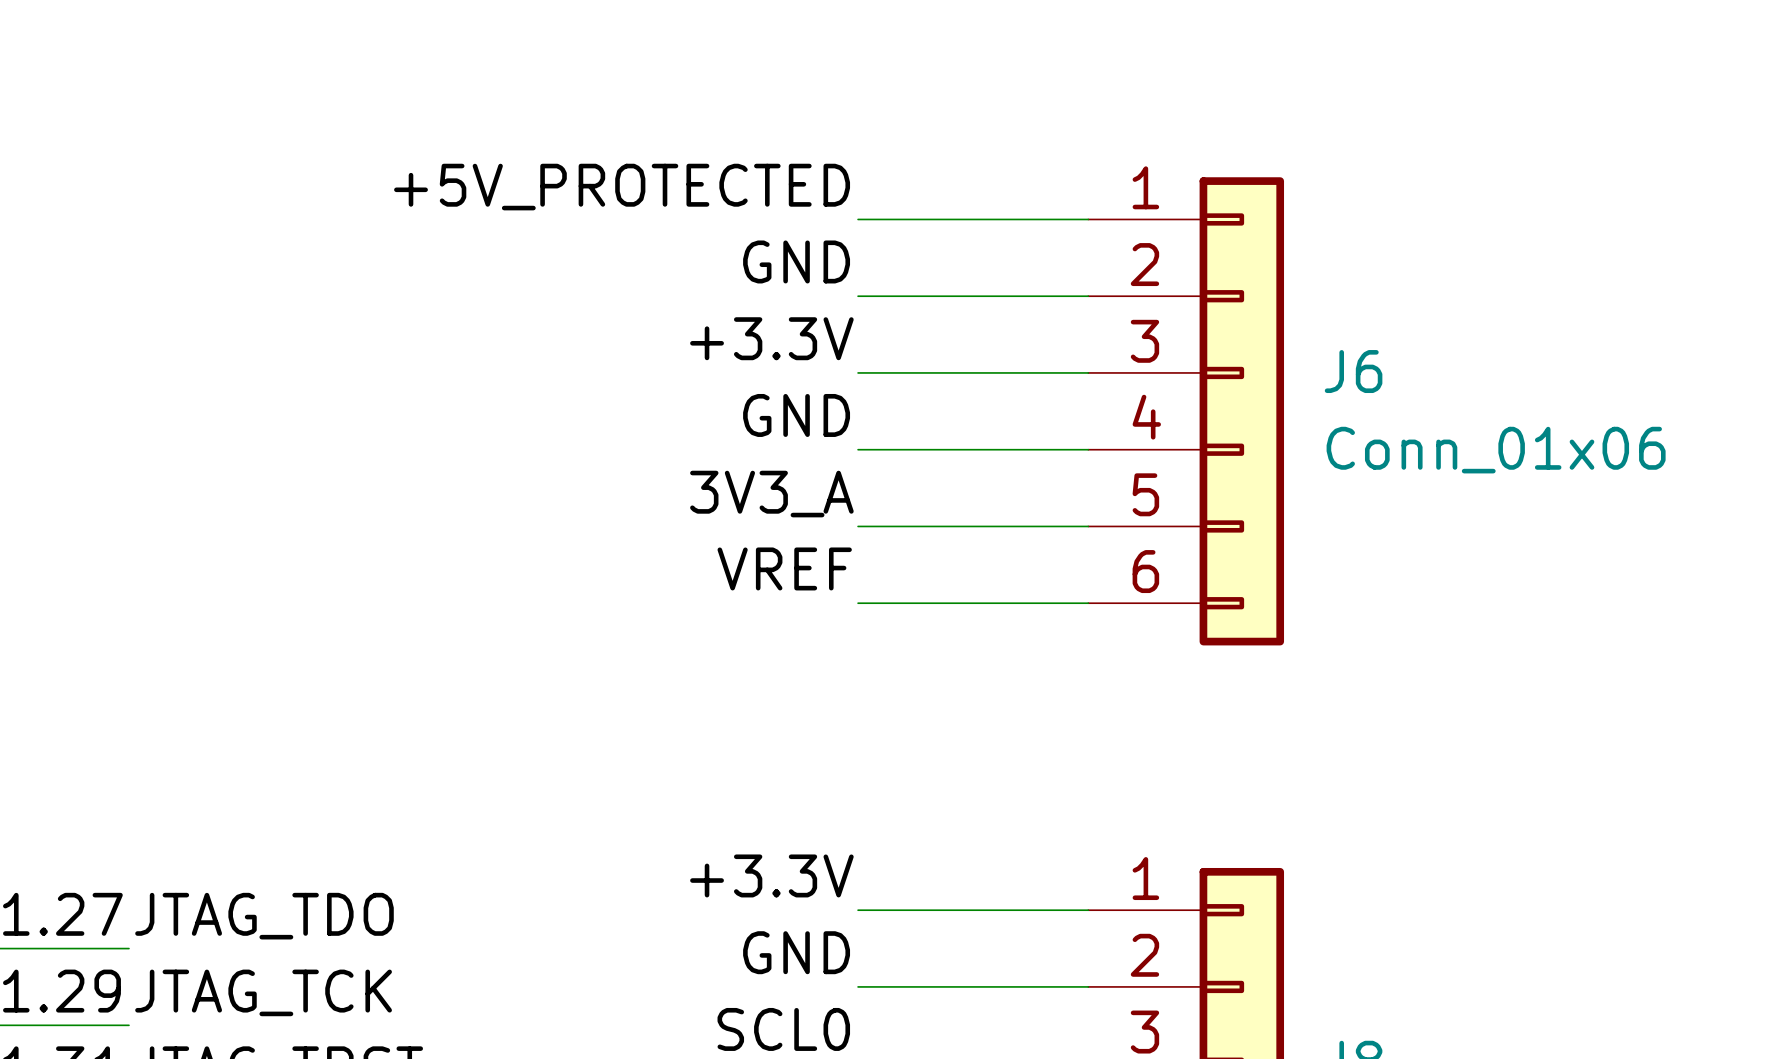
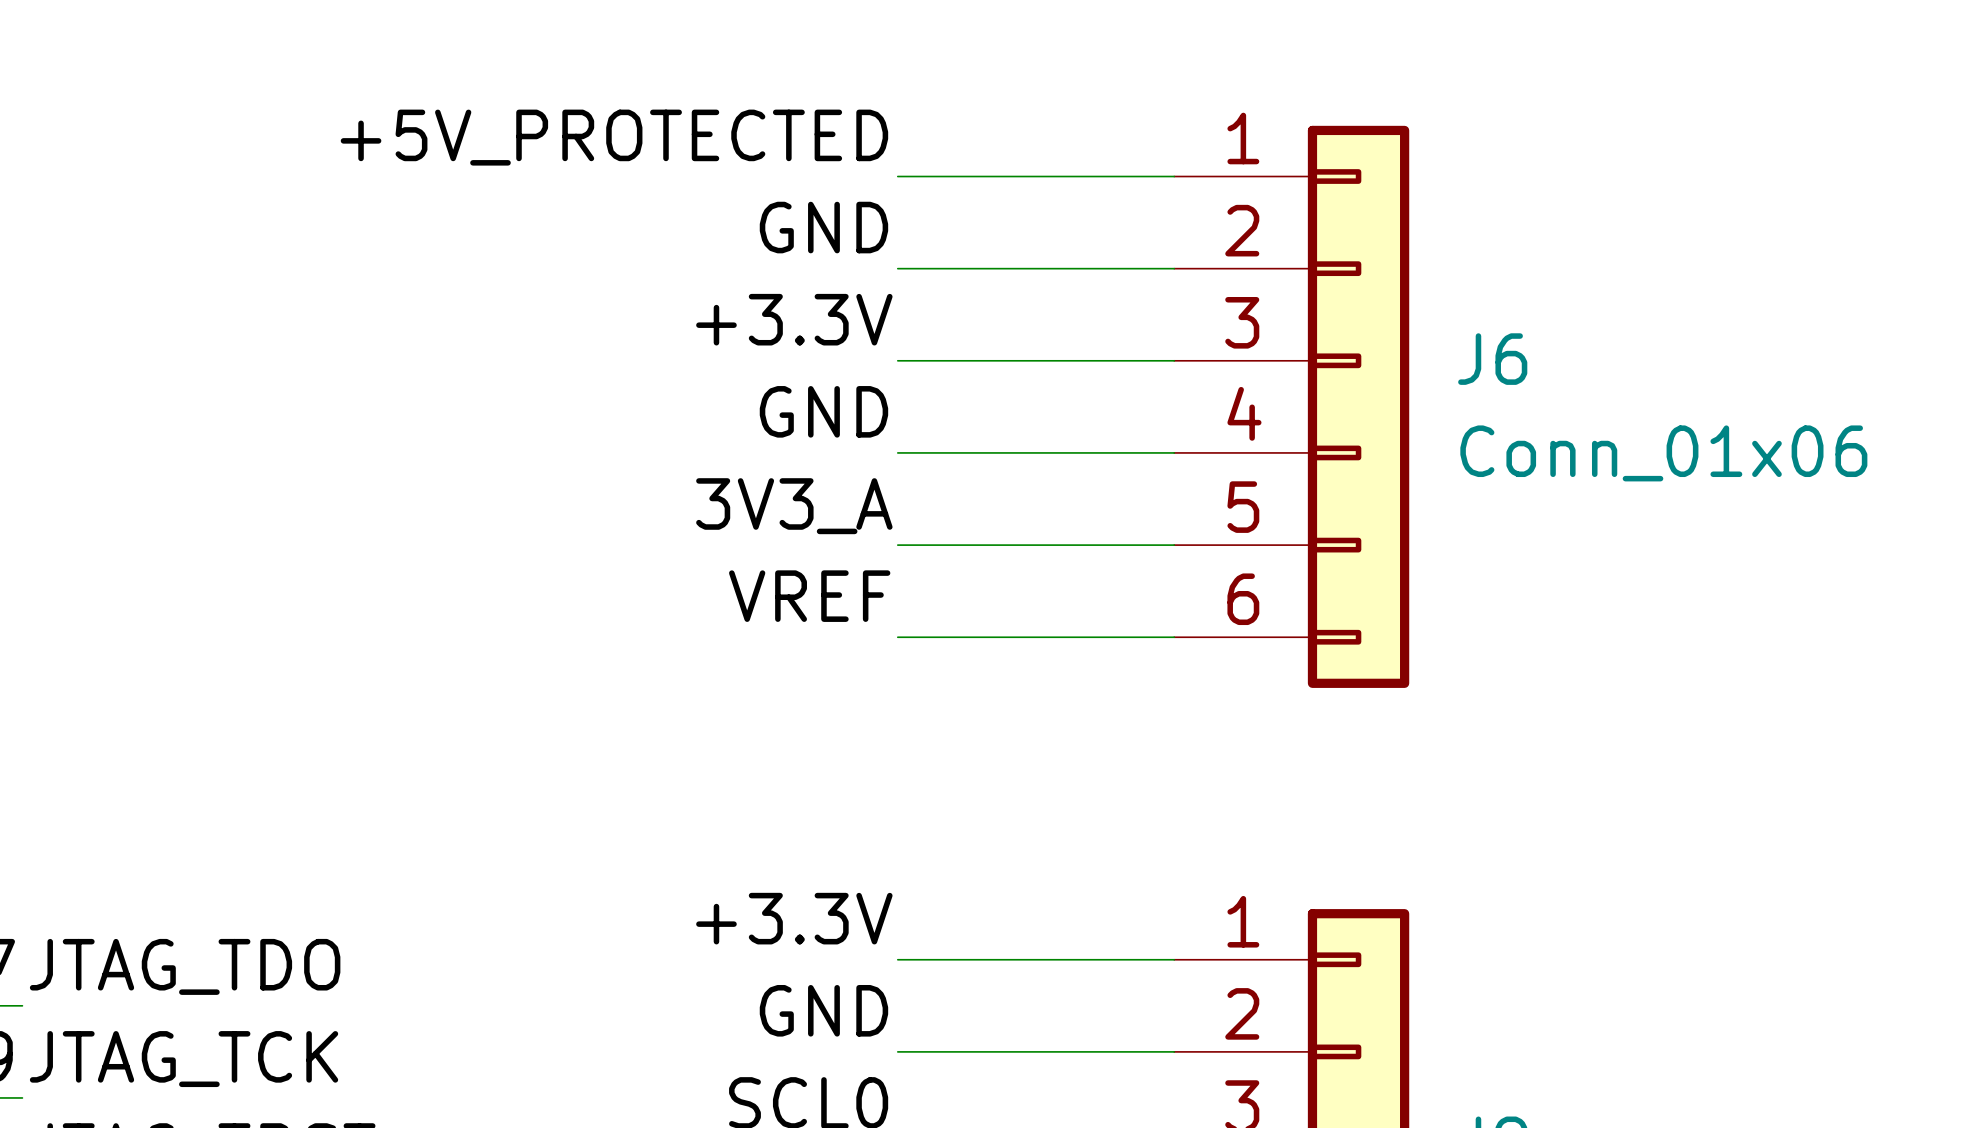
label position: +5V_PROTECTED (622, 187) -> +5V_PROTECTED (614, 137)
wire: (858, 219) (1088, 219) -> (897, 176) (1174, 176)
label position: GND (796, 261) -> GND (823, 227)
wire: (858, 296) (1088, 296) -> (897, 268) (1174, 268)
label position: +3.3V (771, 338) -> +3.3V (794, 319)
wire: (858, 372) (1088, 372) -> (897, 360) (1174, 360)
J6 position: (1186, 411) -> (1291, 406)
label position: GND (796, 415) -> GND (823, 411)
wire: (858, 449) (1088, 449) -> (897, 452) (1174, 452)
label position: 3V3_A (771, 494) -> 3V3_A (794, 506)
wire: (858, 526) (1088, 526) -> (897, 545) (1174, 545)
label position: VREF (784, 568) -> VREF (809, 596)
wire: (858, 603) (1088, 603) -> (897, 637) (1174, 637)

